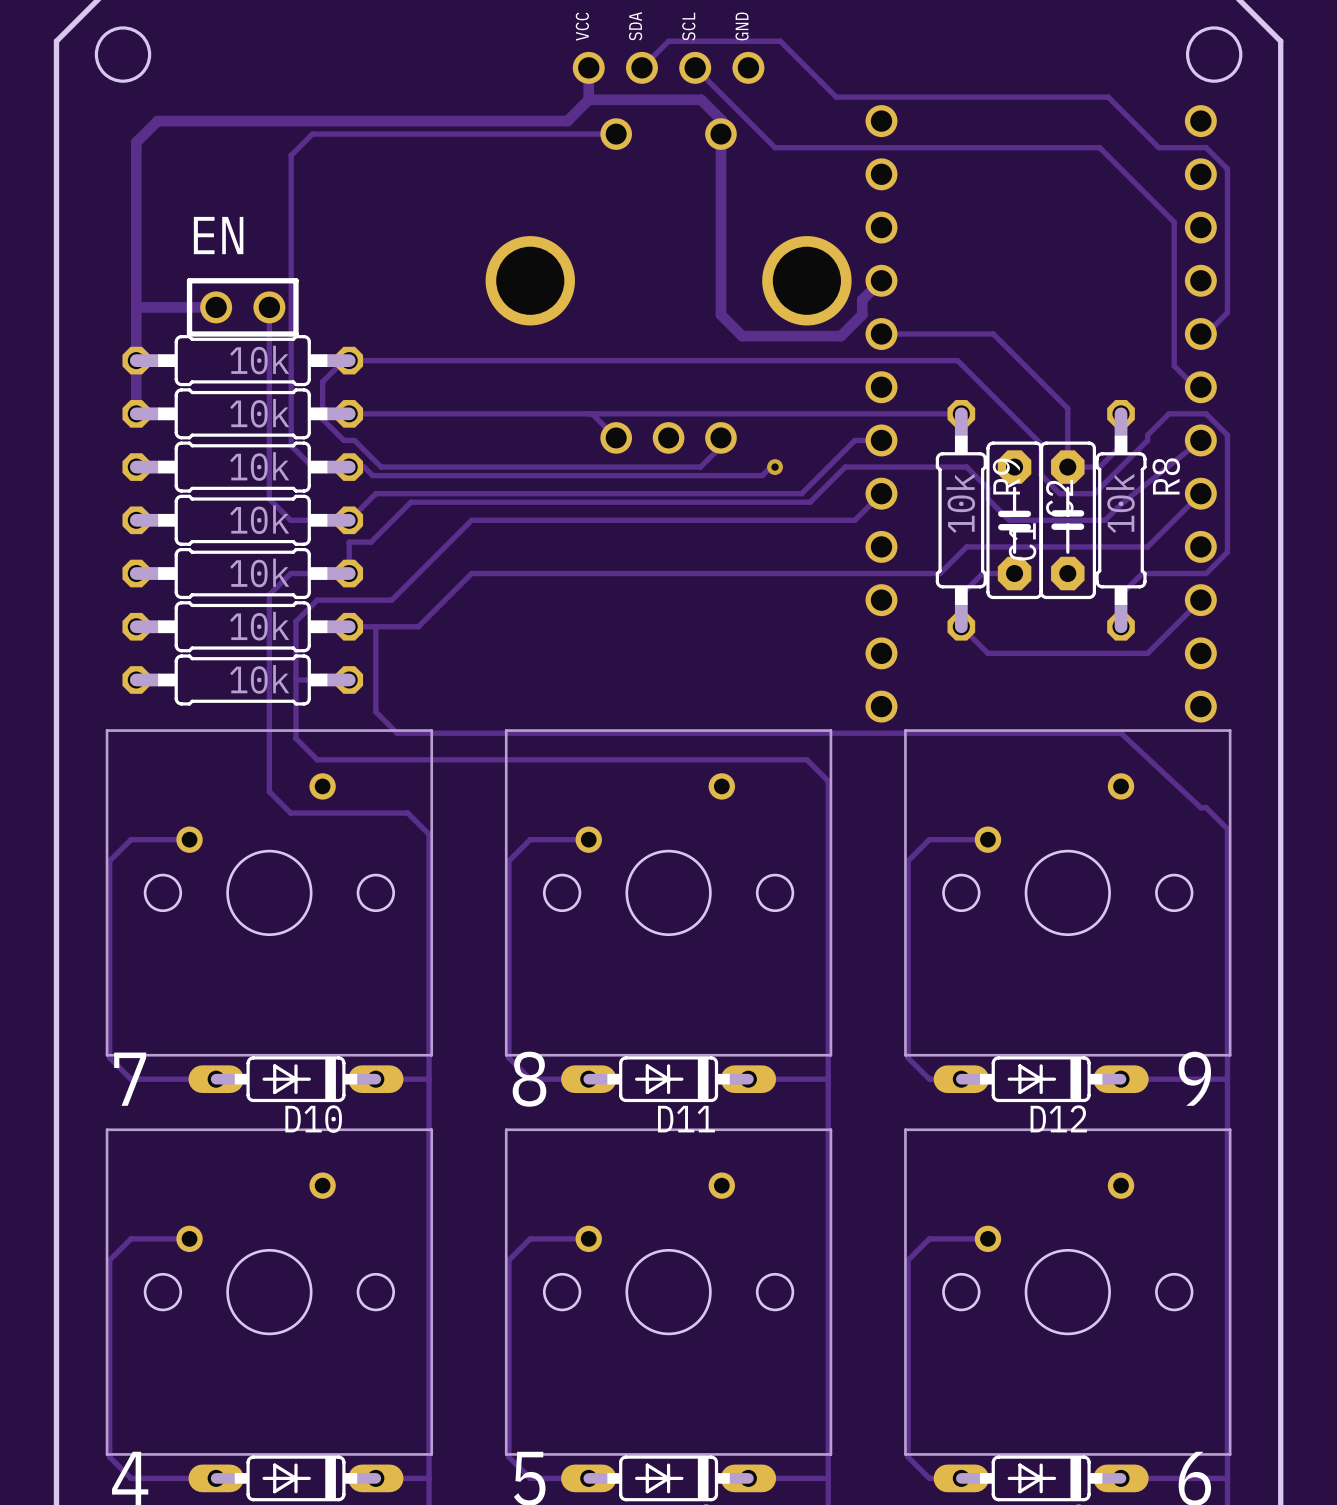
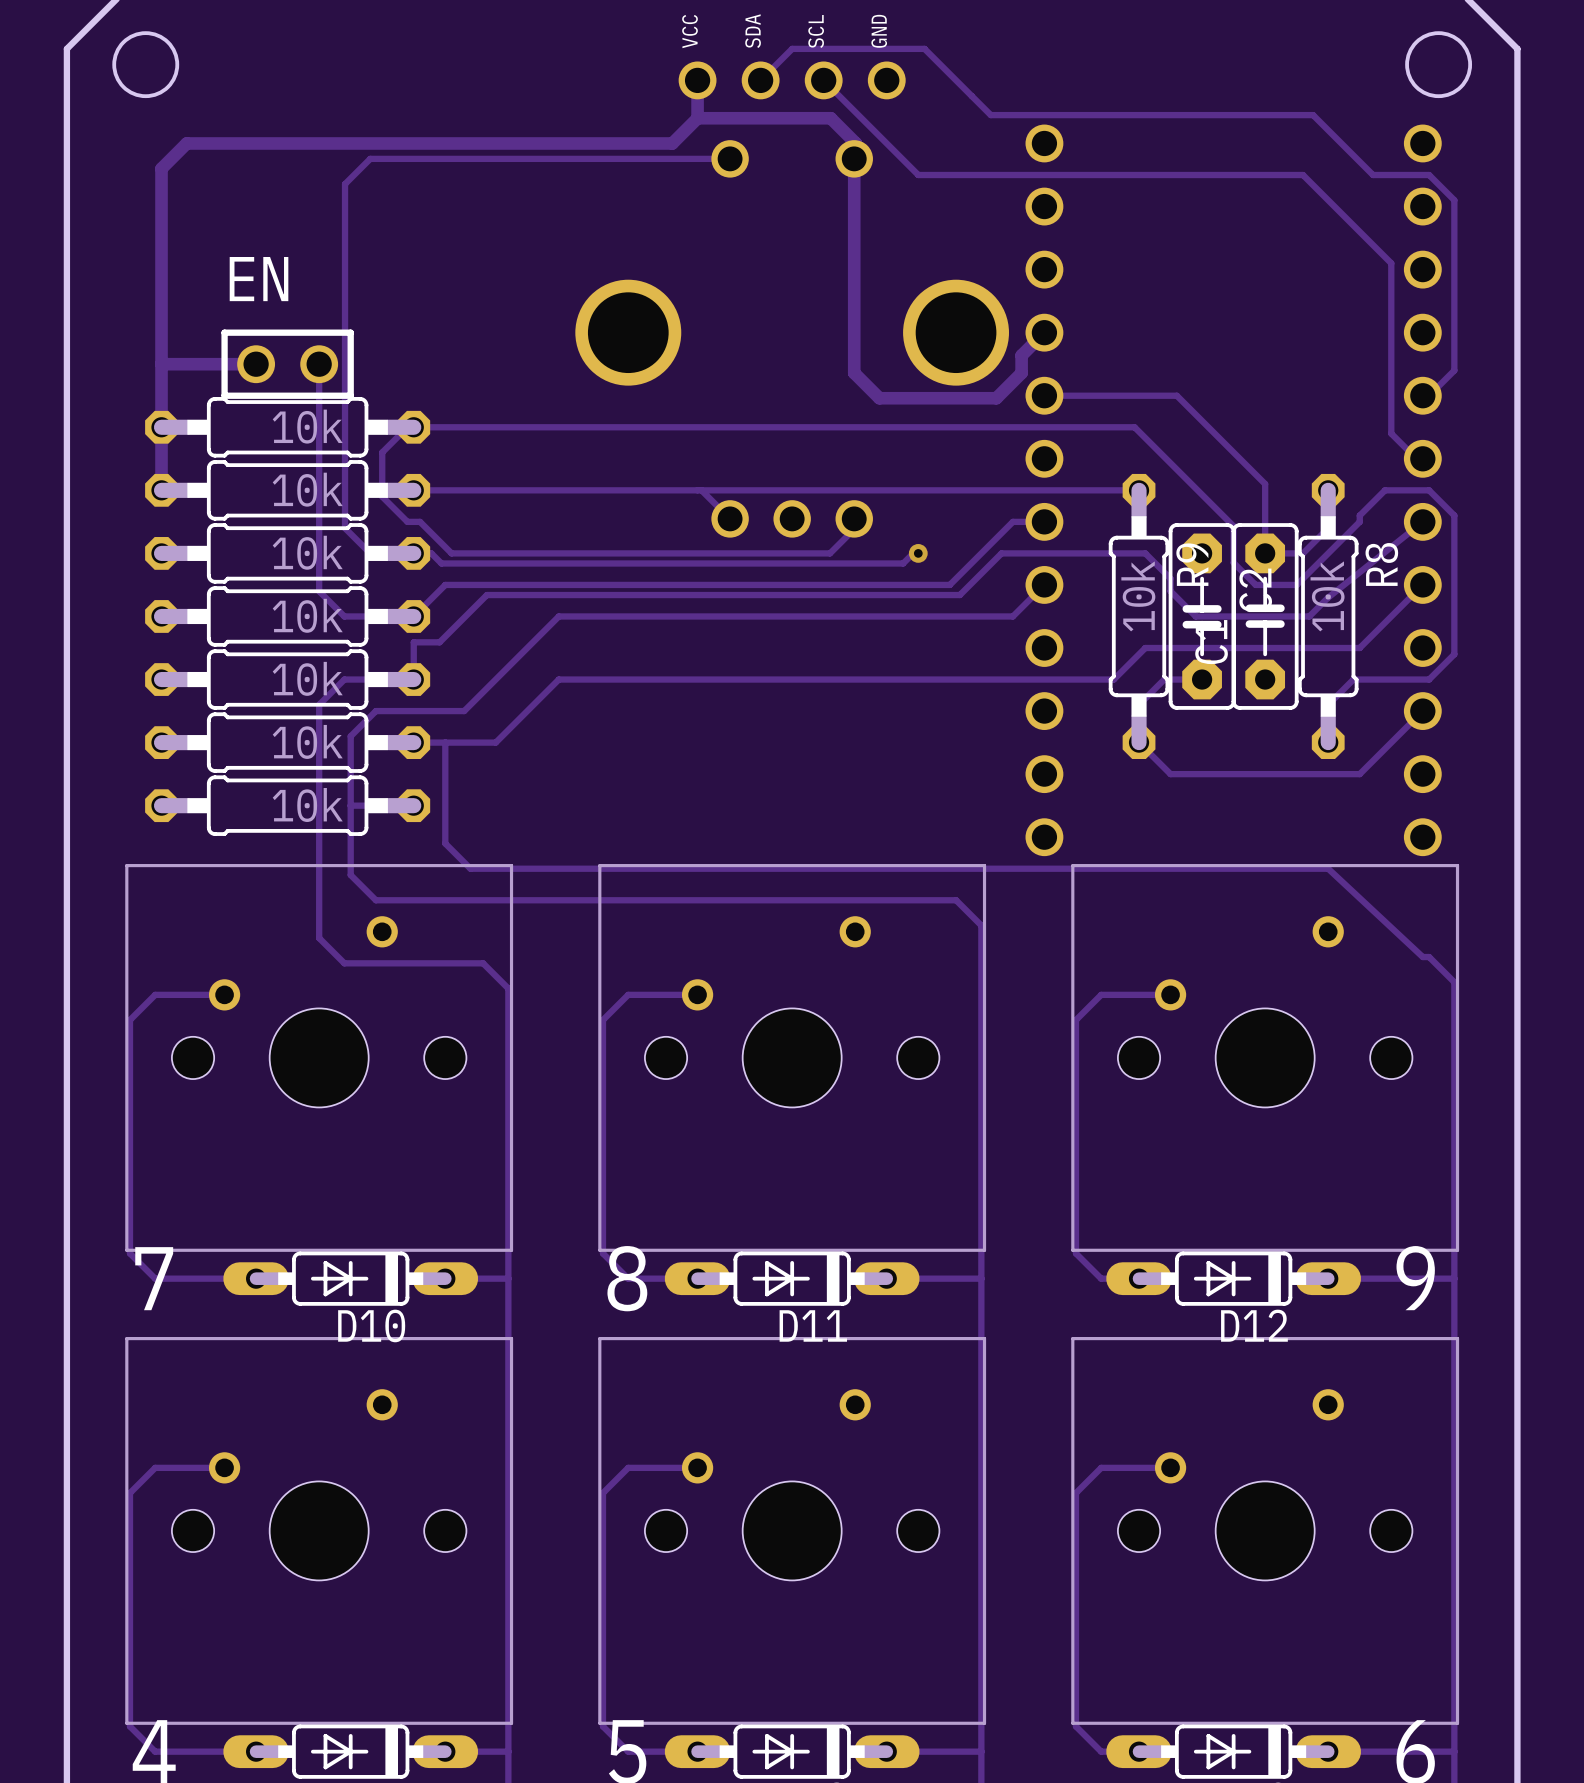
part footprint: [105, 729, 434, 1057] -> [125, 864, 514, 1252]
part footprint: [504, 729, 833, 1057] -> [598, 864, 987, 1252]
part footprint: [904, 729, 1232, 1057] -> [1071, 864, 1460, 1252]
part footprint: [105, 1128, 434, 1456] -> [125, 1337, 514, 1725]
part footprint: [504, 1128, 833, 1456] -> [598, 1337, 987, 1725]
part footprint: [904, 1128, 1232, 1456] -> [1071, 1337, 1460, 1725]

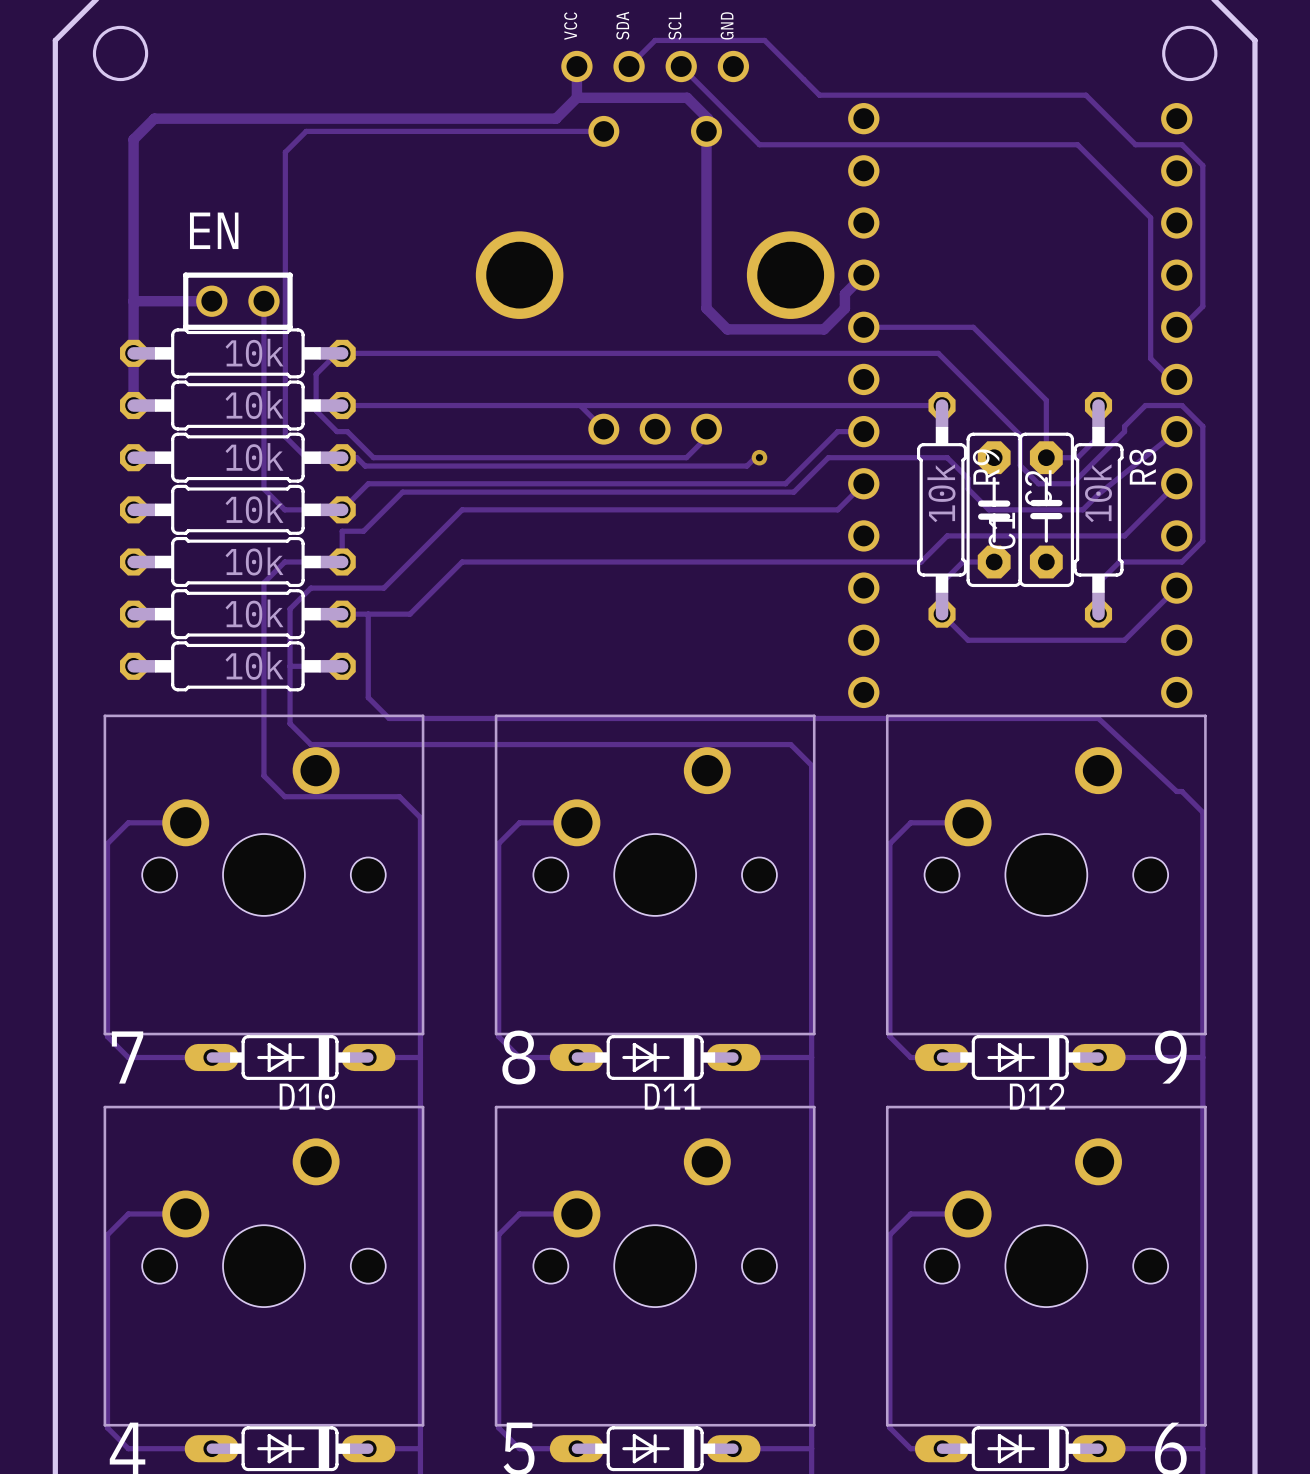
part footprint: [125, 864, 514, 1252] -> [103, 714, 425, 1036]
part footprint: [598, 864, 987, 1252] -> [494, 714, 816, 1036]
part footprint: [1071, 864, 1460, 1252] -> [885, 714, 1207, 1036]
part footprint: [125, 1337, 514, 1725] -> [103, 1105, 425, 1427]
part footprint: [598, 1337, 987, 1725] -> [494, 1105, 816, 1427]
part footprint: [1071, 1337, 1460, 1725] -> [885, 1105, 1207, 1427]

